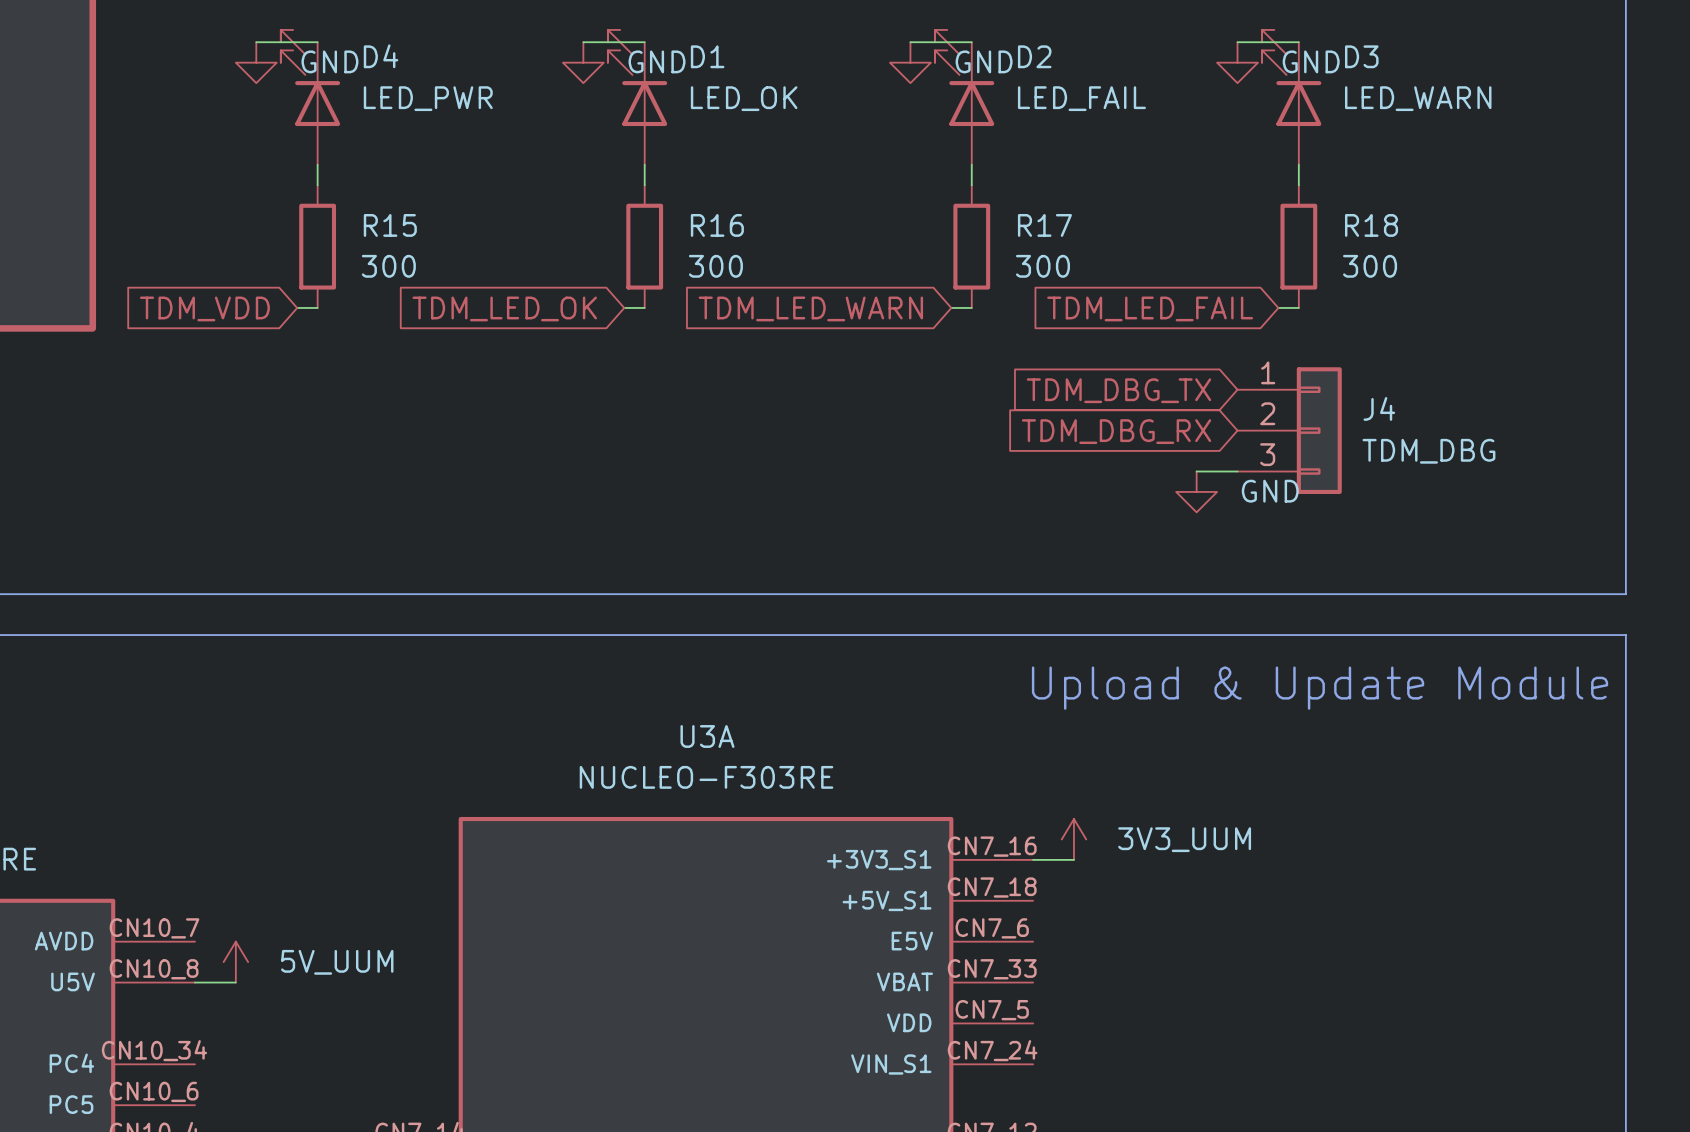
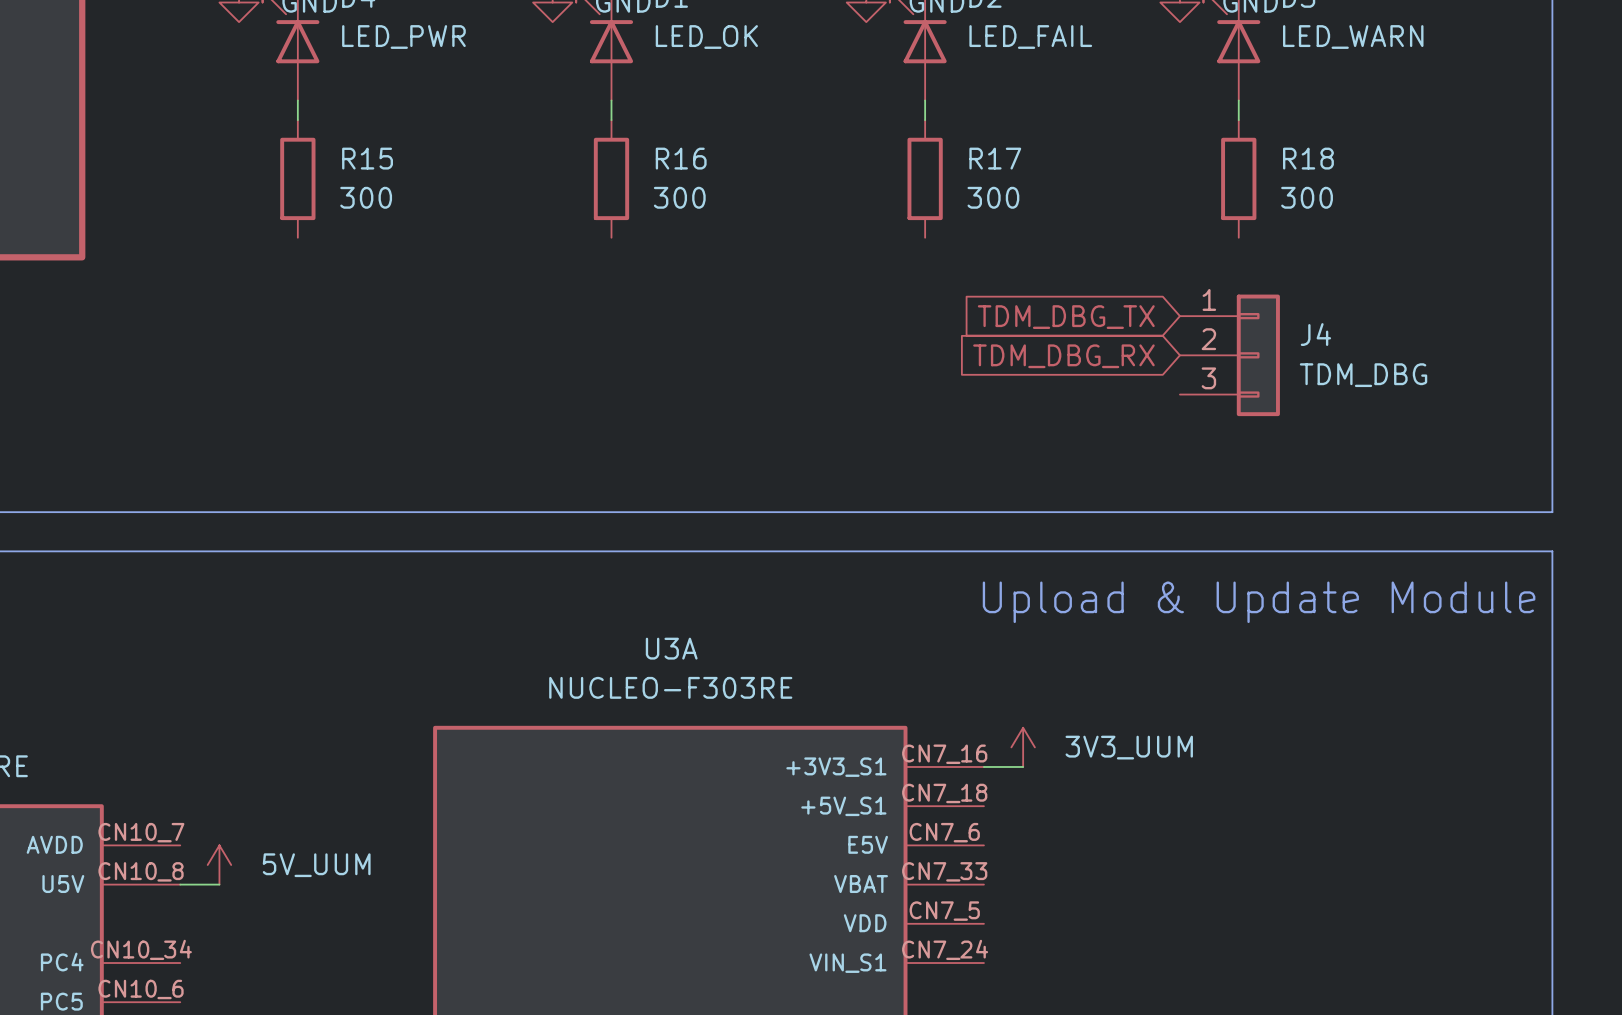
wire: (297, 307) (317, 307) -> none
wire: (624, 307) (644, 307) -> none
wire: (951, 307) (971, 307) -> none
wire: (1278, 307) (1298, 307) -> none
global label: TDM_VDD (204, 308) -> none
global label: TDM_LED_OK (504, 308) -> none
global label: TDM_LED_WARN (810, 308) -> none
global label: TDM_LED_FAIL (1150, 308) -> none
wire: (1196, 471) (1237, 471) -> none
power symbol: GND (1196, 491) -> none

